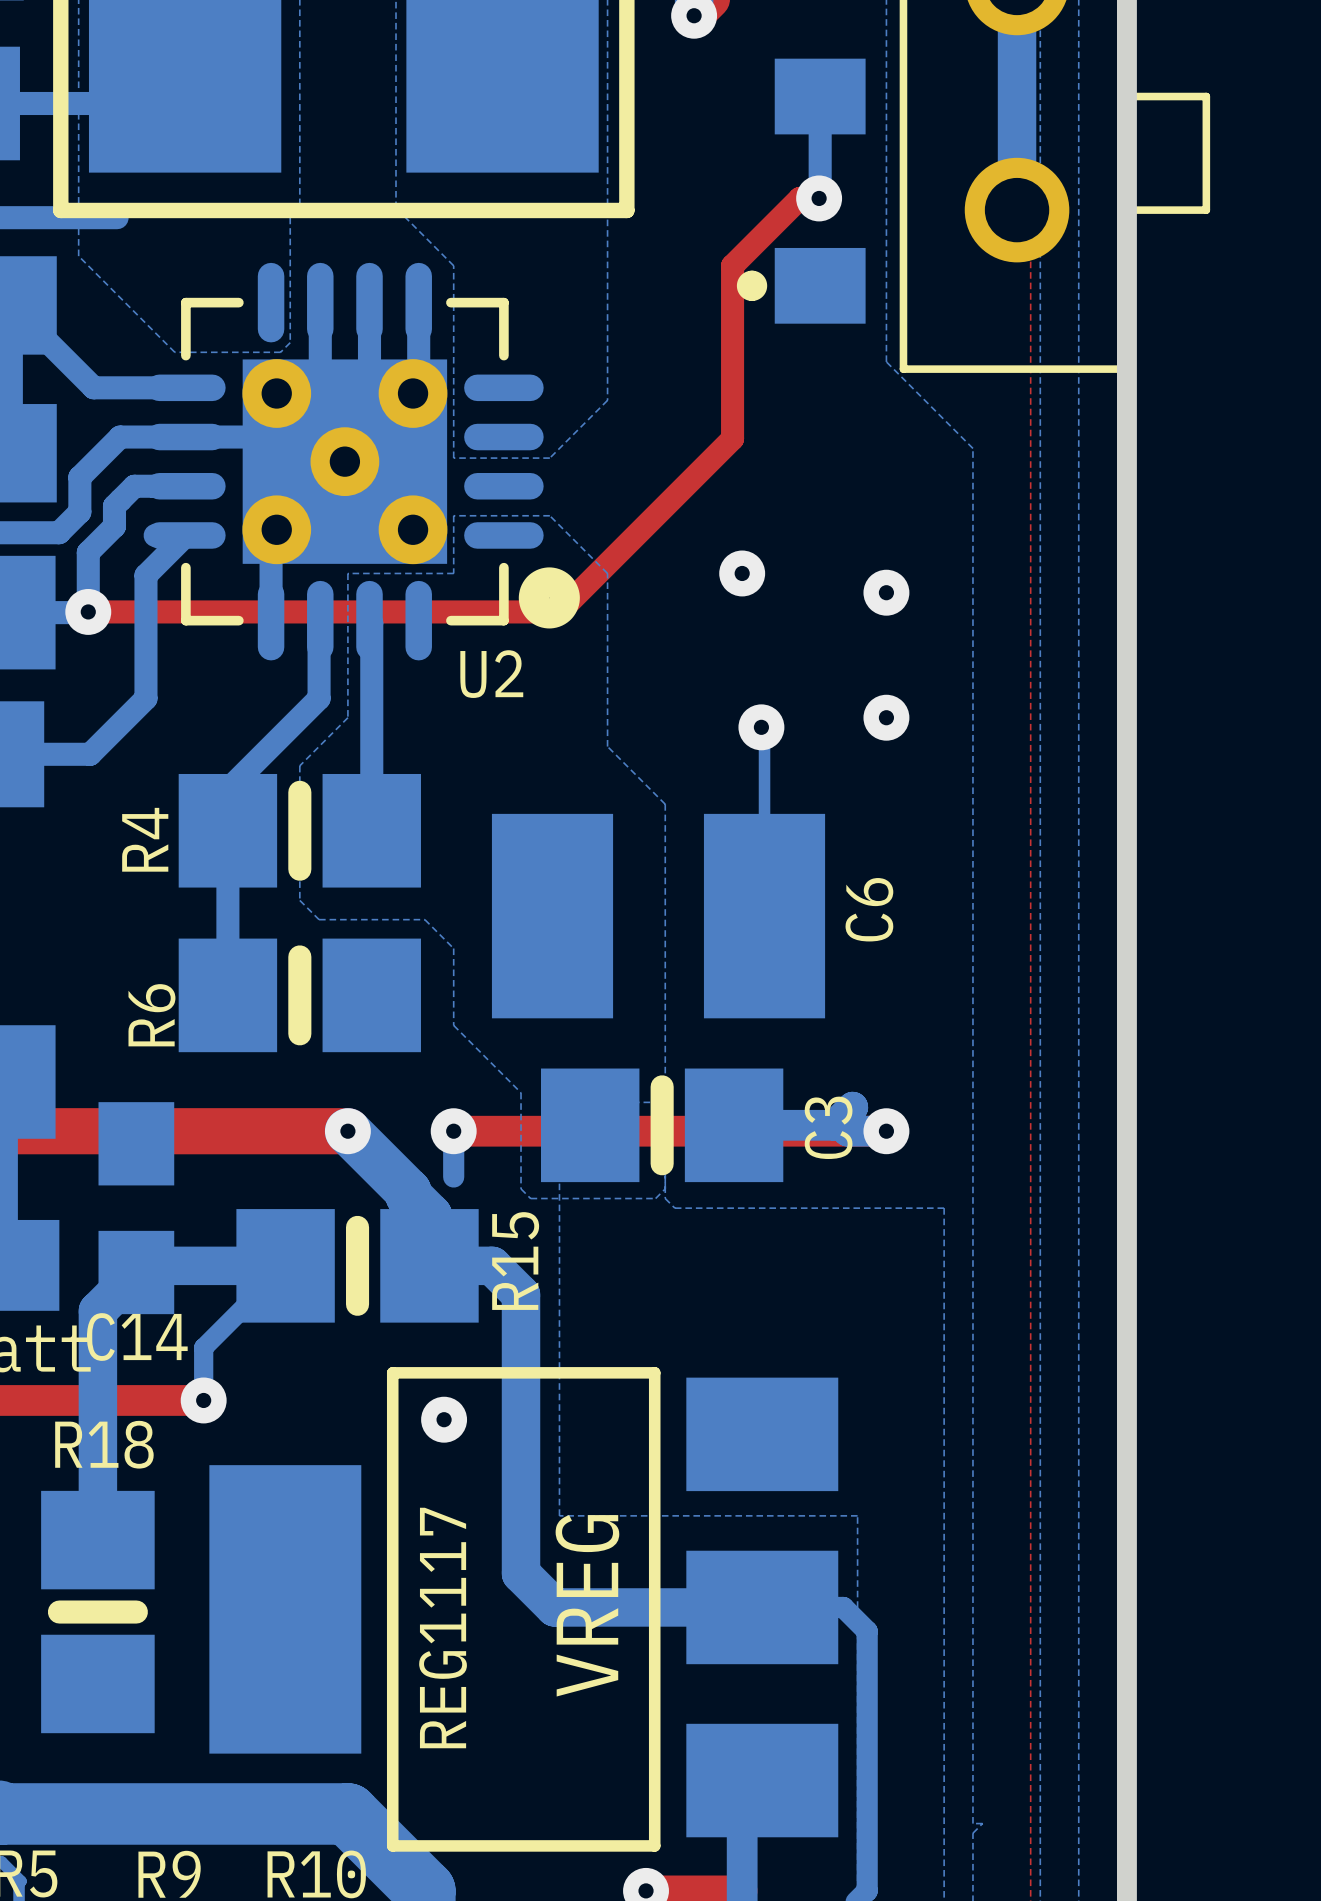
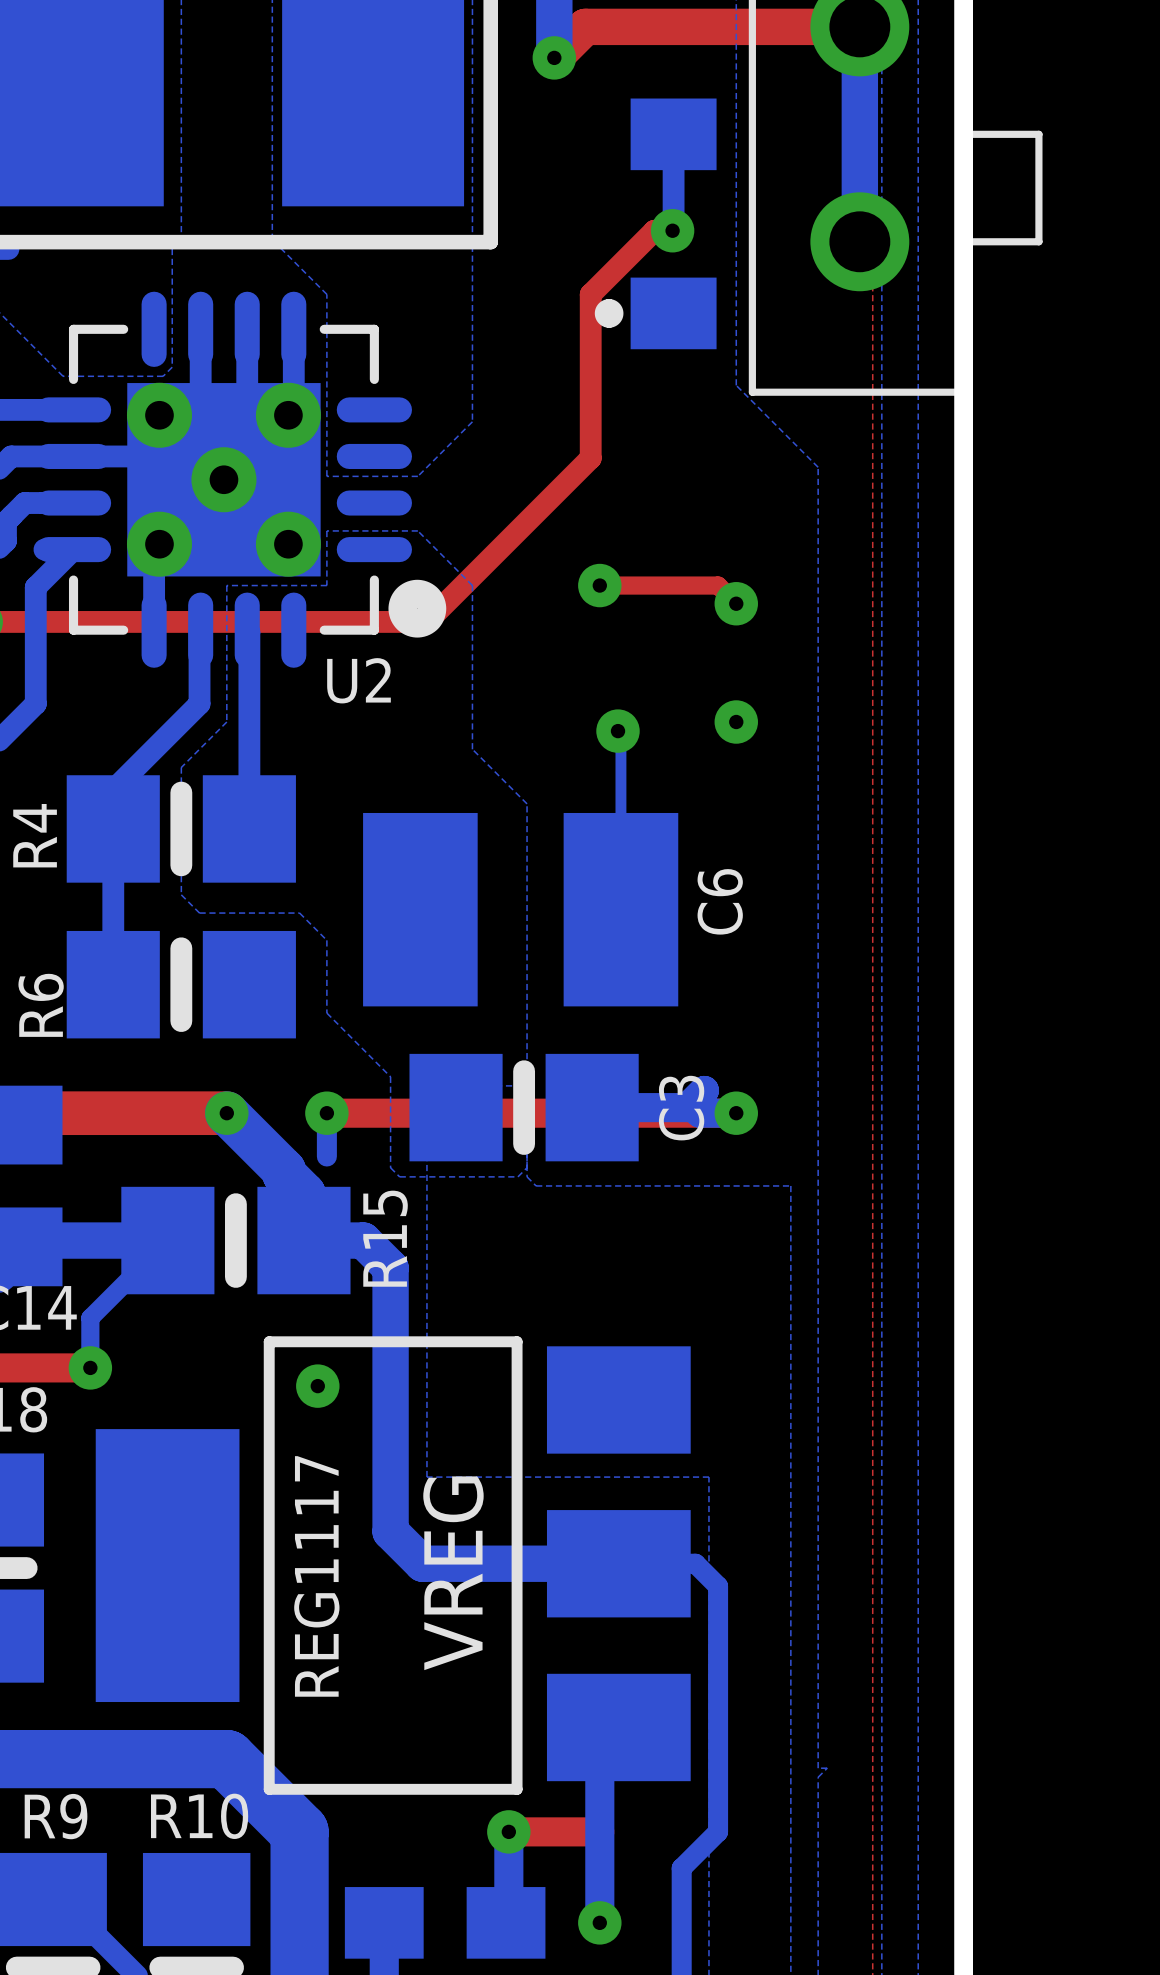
top track: none -> (599, 585) (718, 585) (736, 603)

